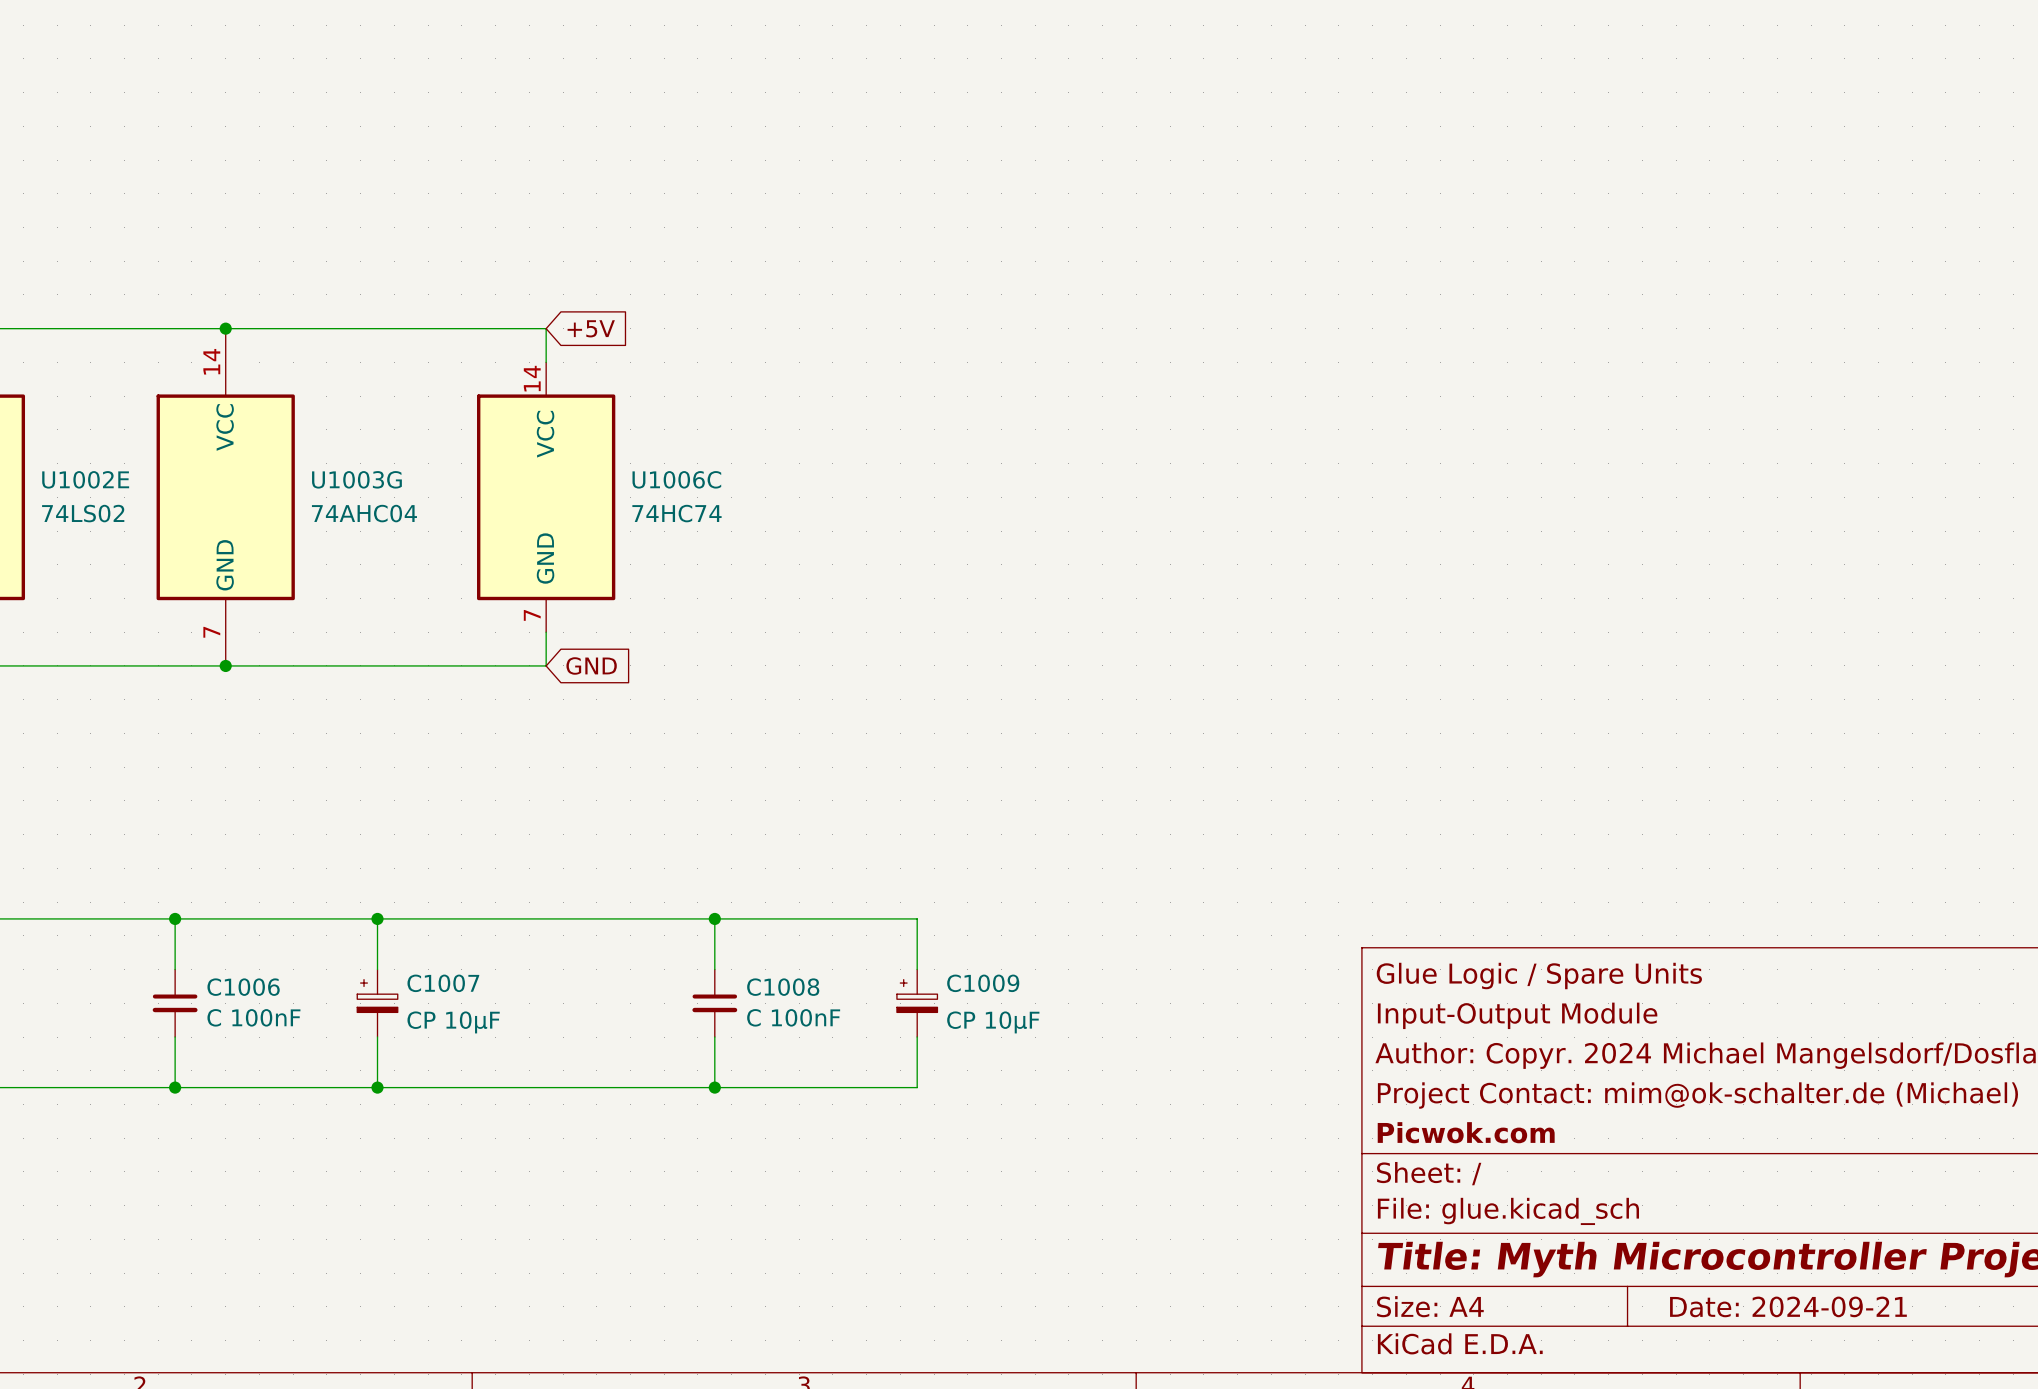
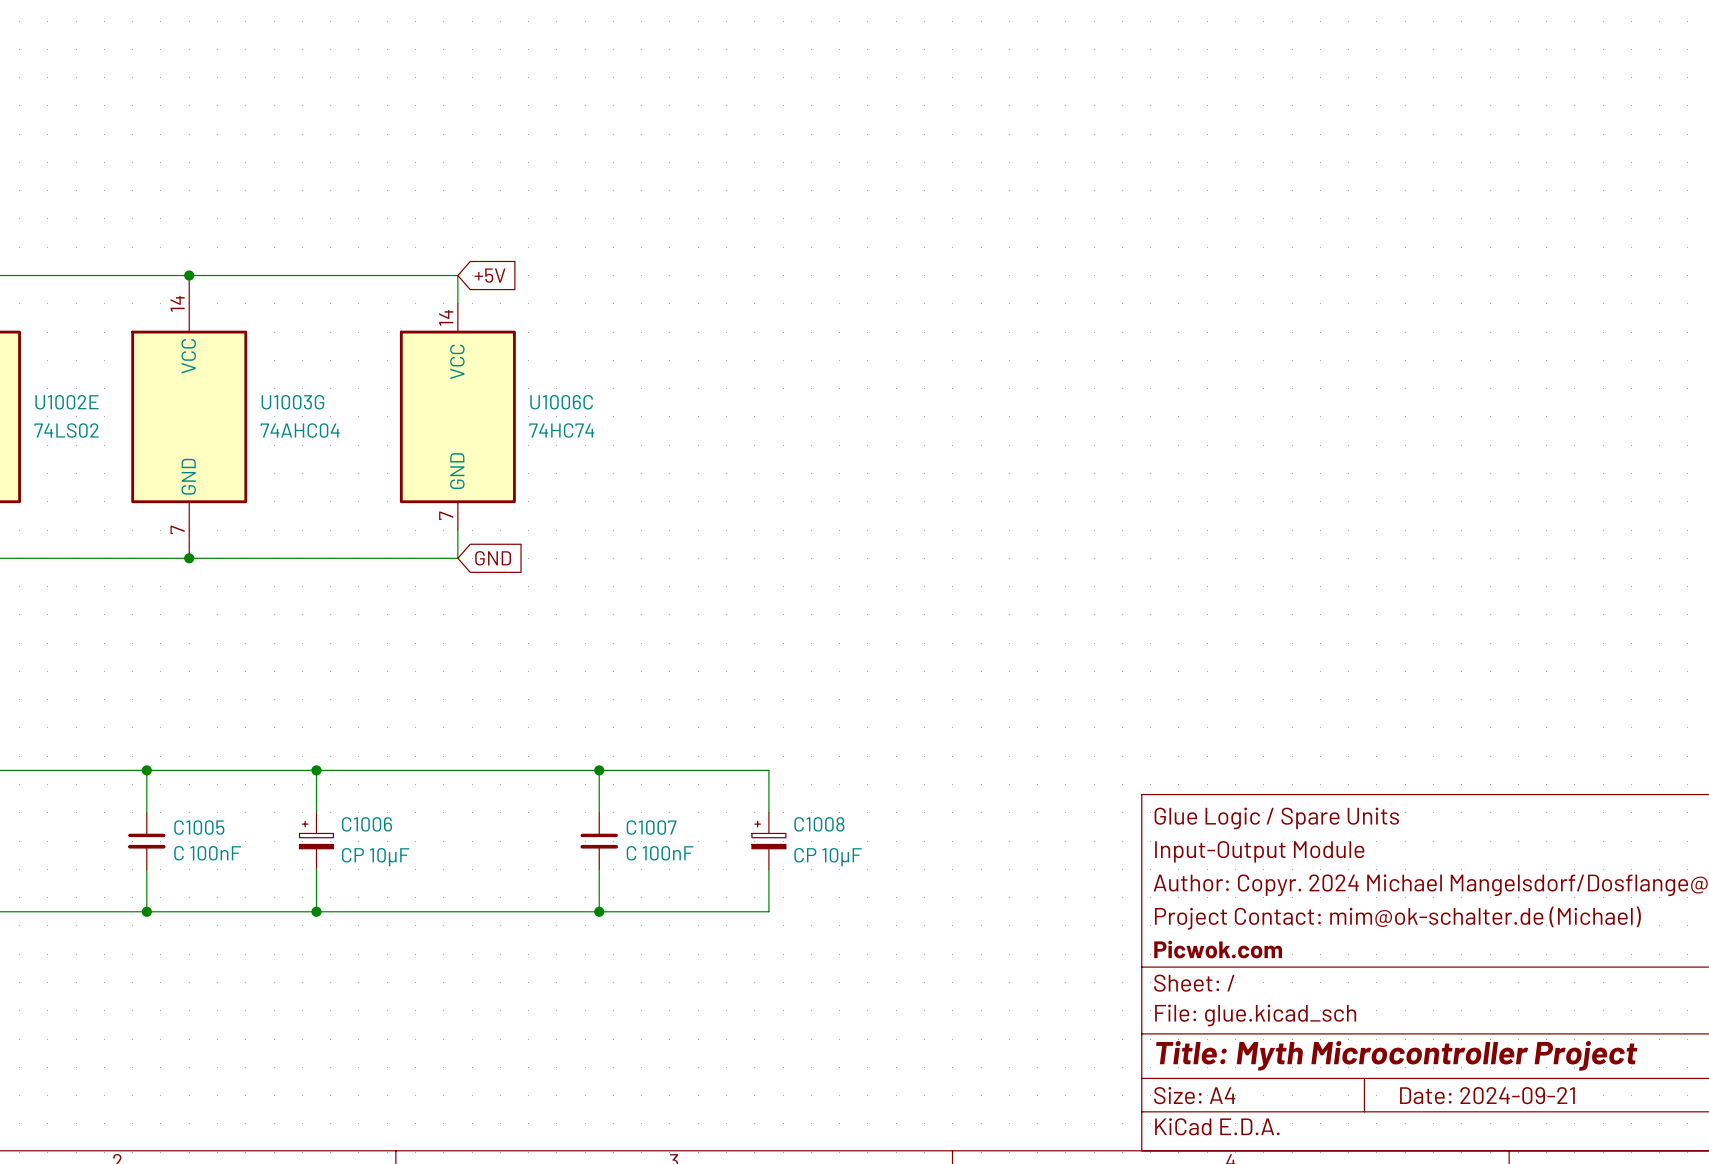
C1007 name: C1007 (443, 983) -> C1006 (367, 824)
C1009 name: C1009 (983, 983) -> C1008 (819, 824)
C1006 name: C1006 (243, 987) -> C1005 (199, 827)
C1008 name: C1008 (783, 987) -> C1007 (651, 827)

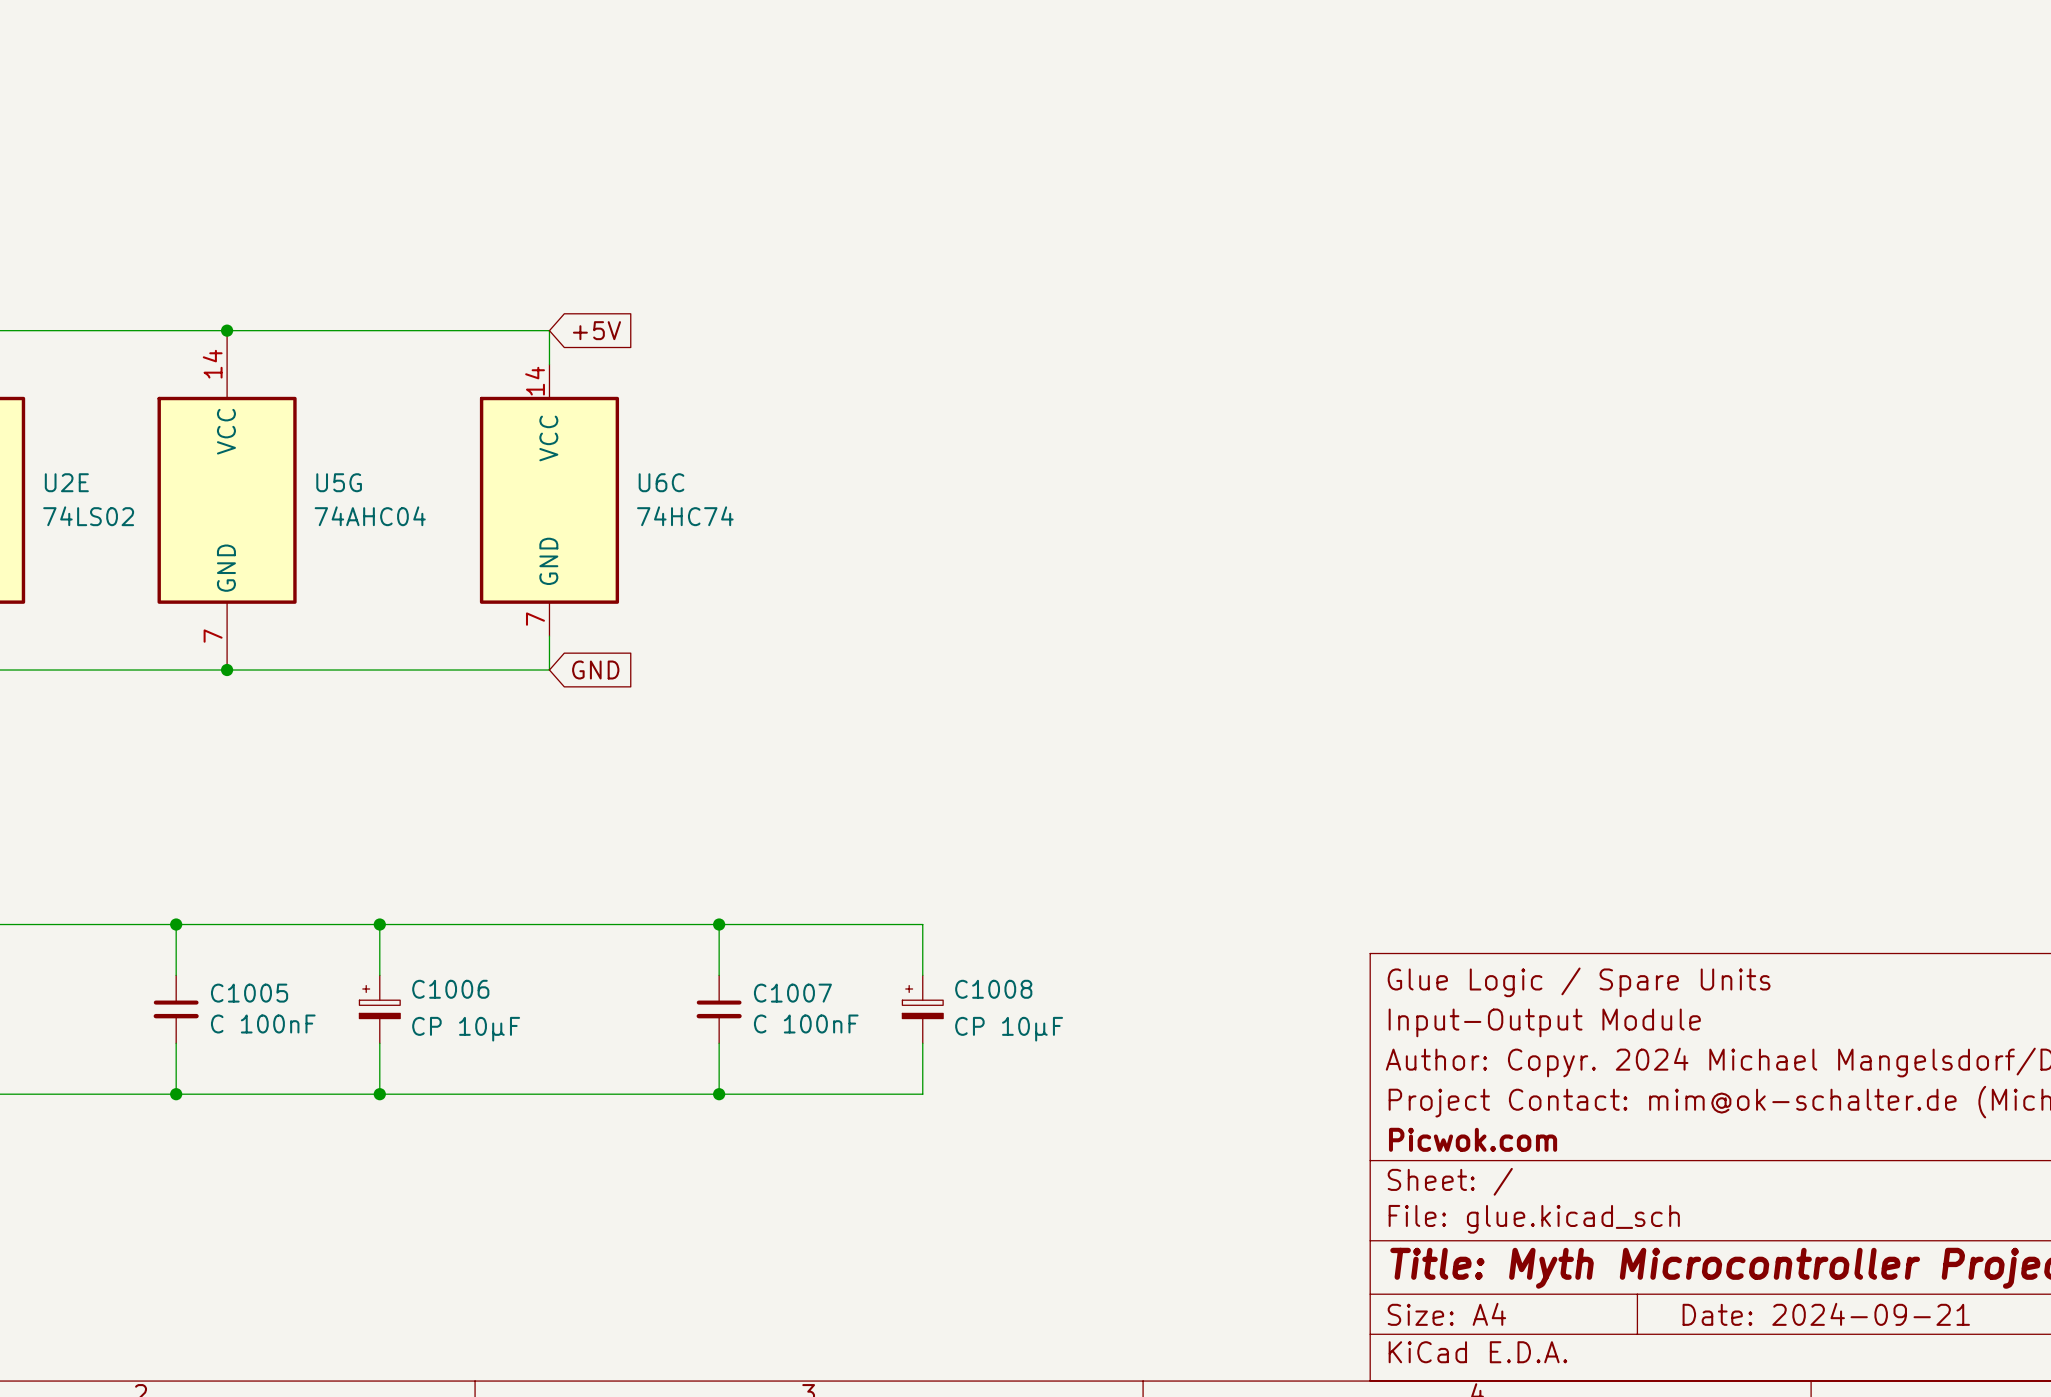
U1002E name: U1002E (66, 402) -> U2E (66, 482)
U1003G name: U1003G (292, 402) -> U5G (339, 482)
U1006C name: U1006C (561, 402) -> U6C (661, 482)

